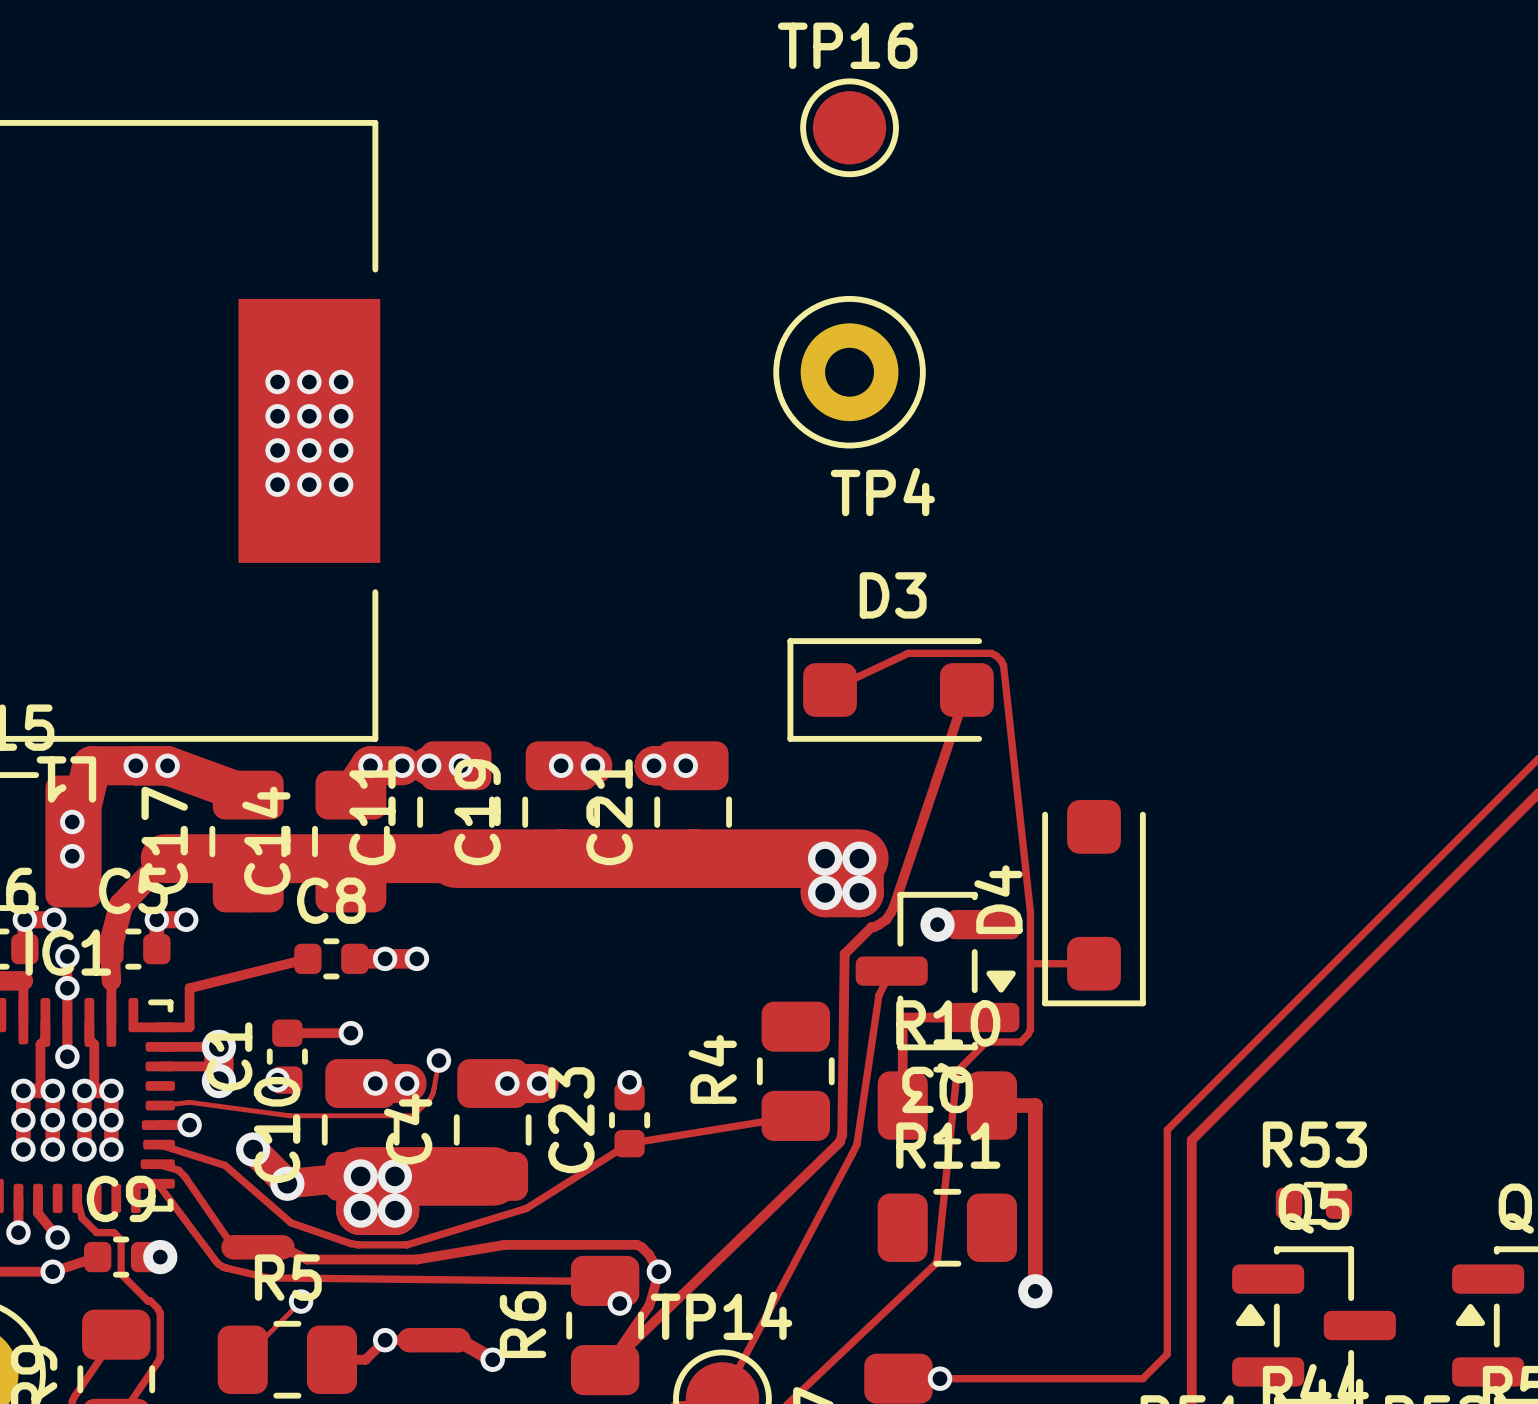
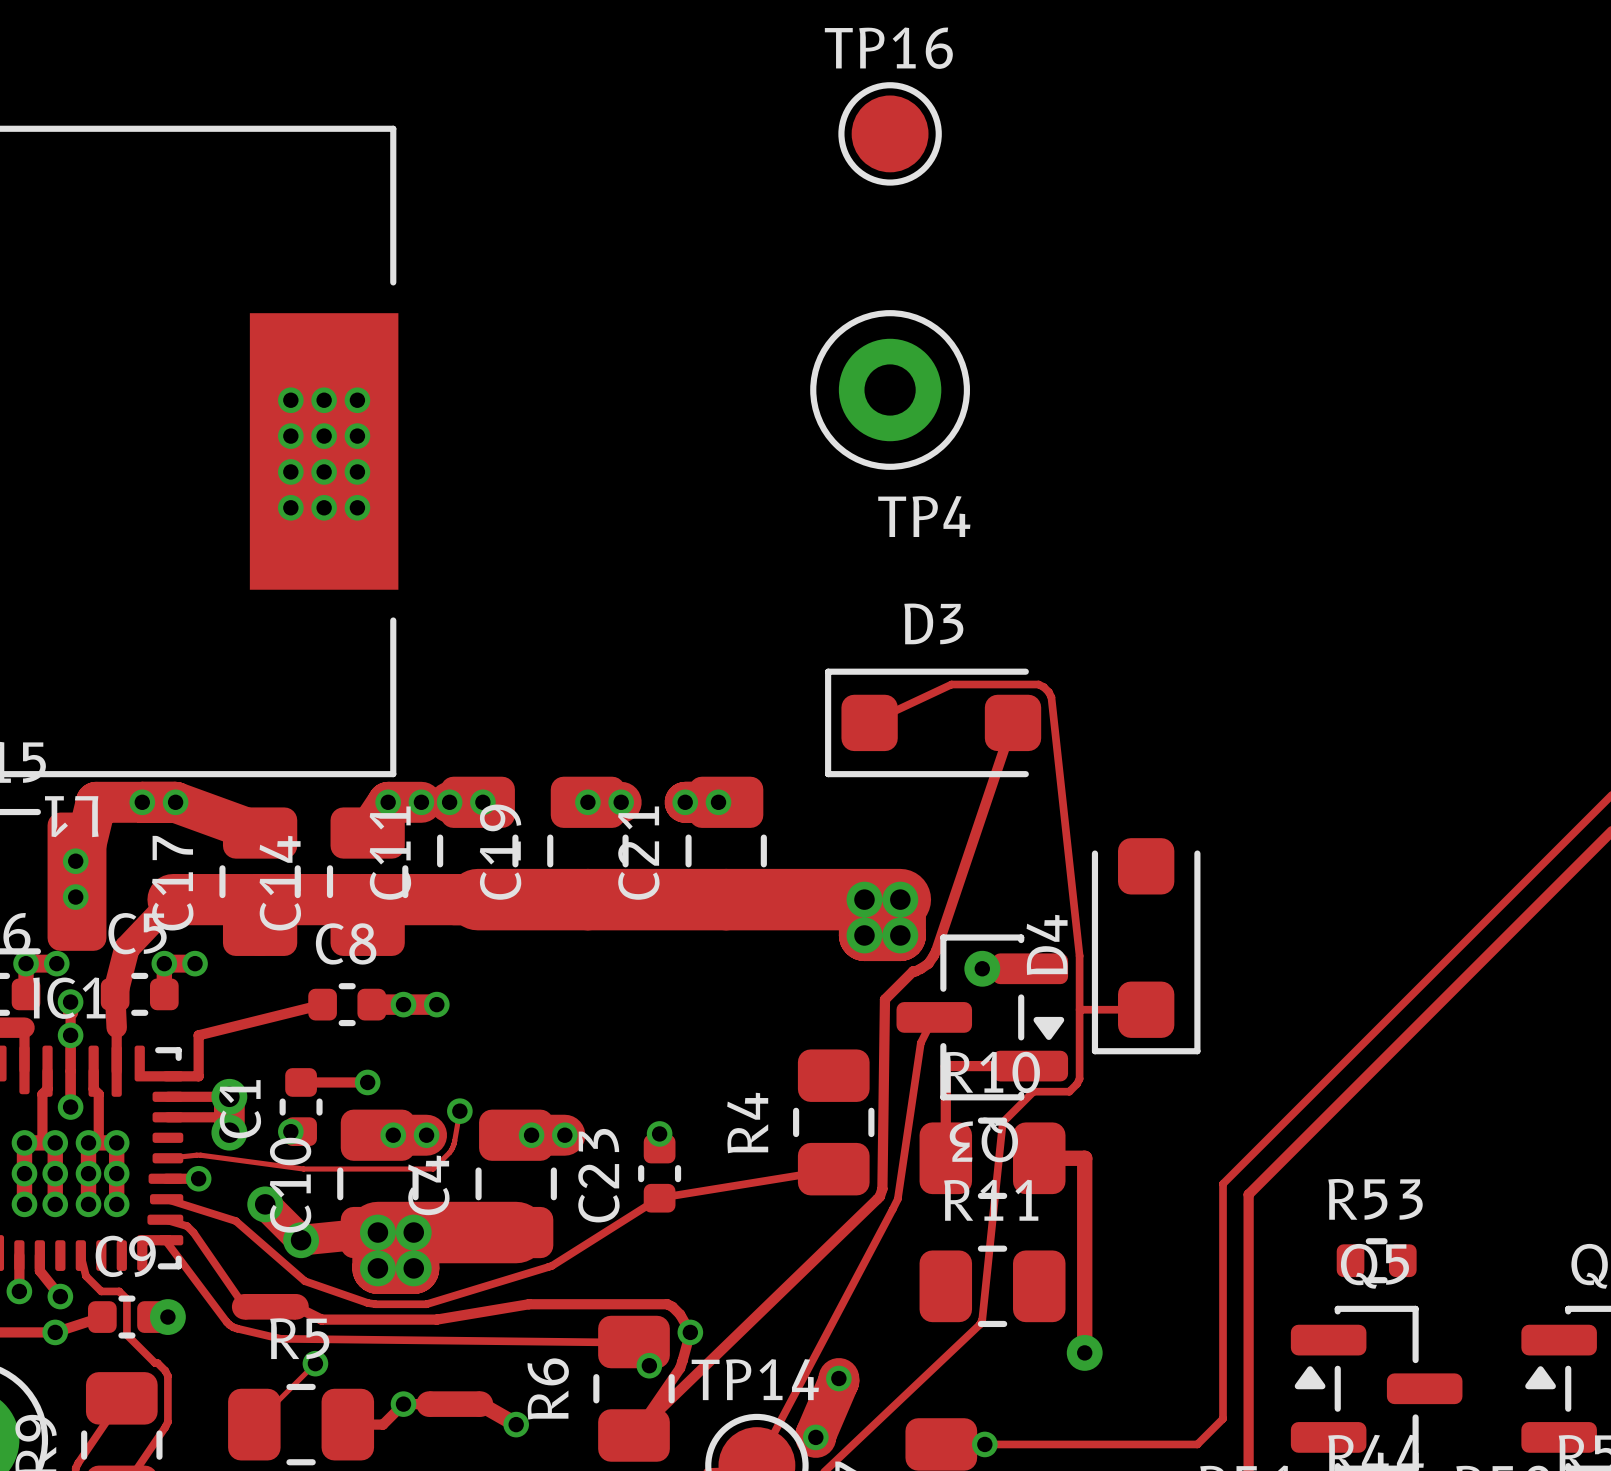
track: none -> (838, 1378) (815, 1437)
via: none -> (838, 1378)
via: none -> (815, 1437)

